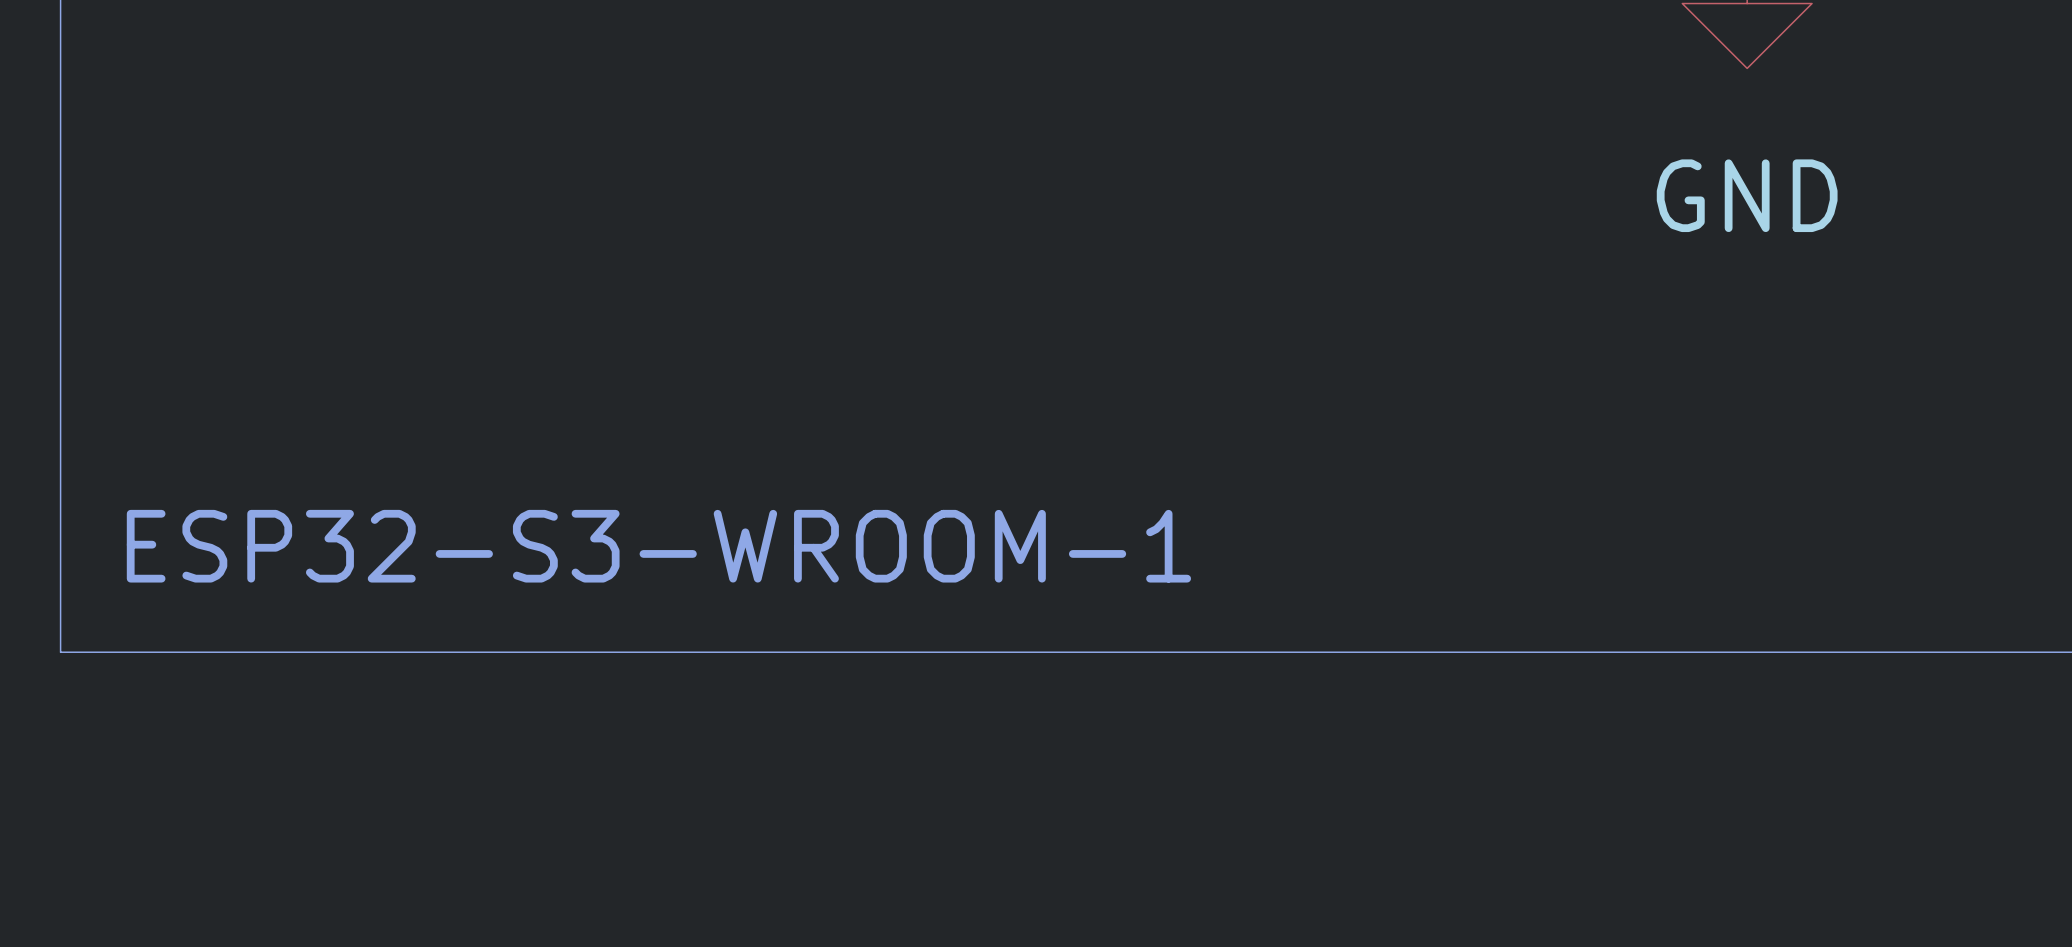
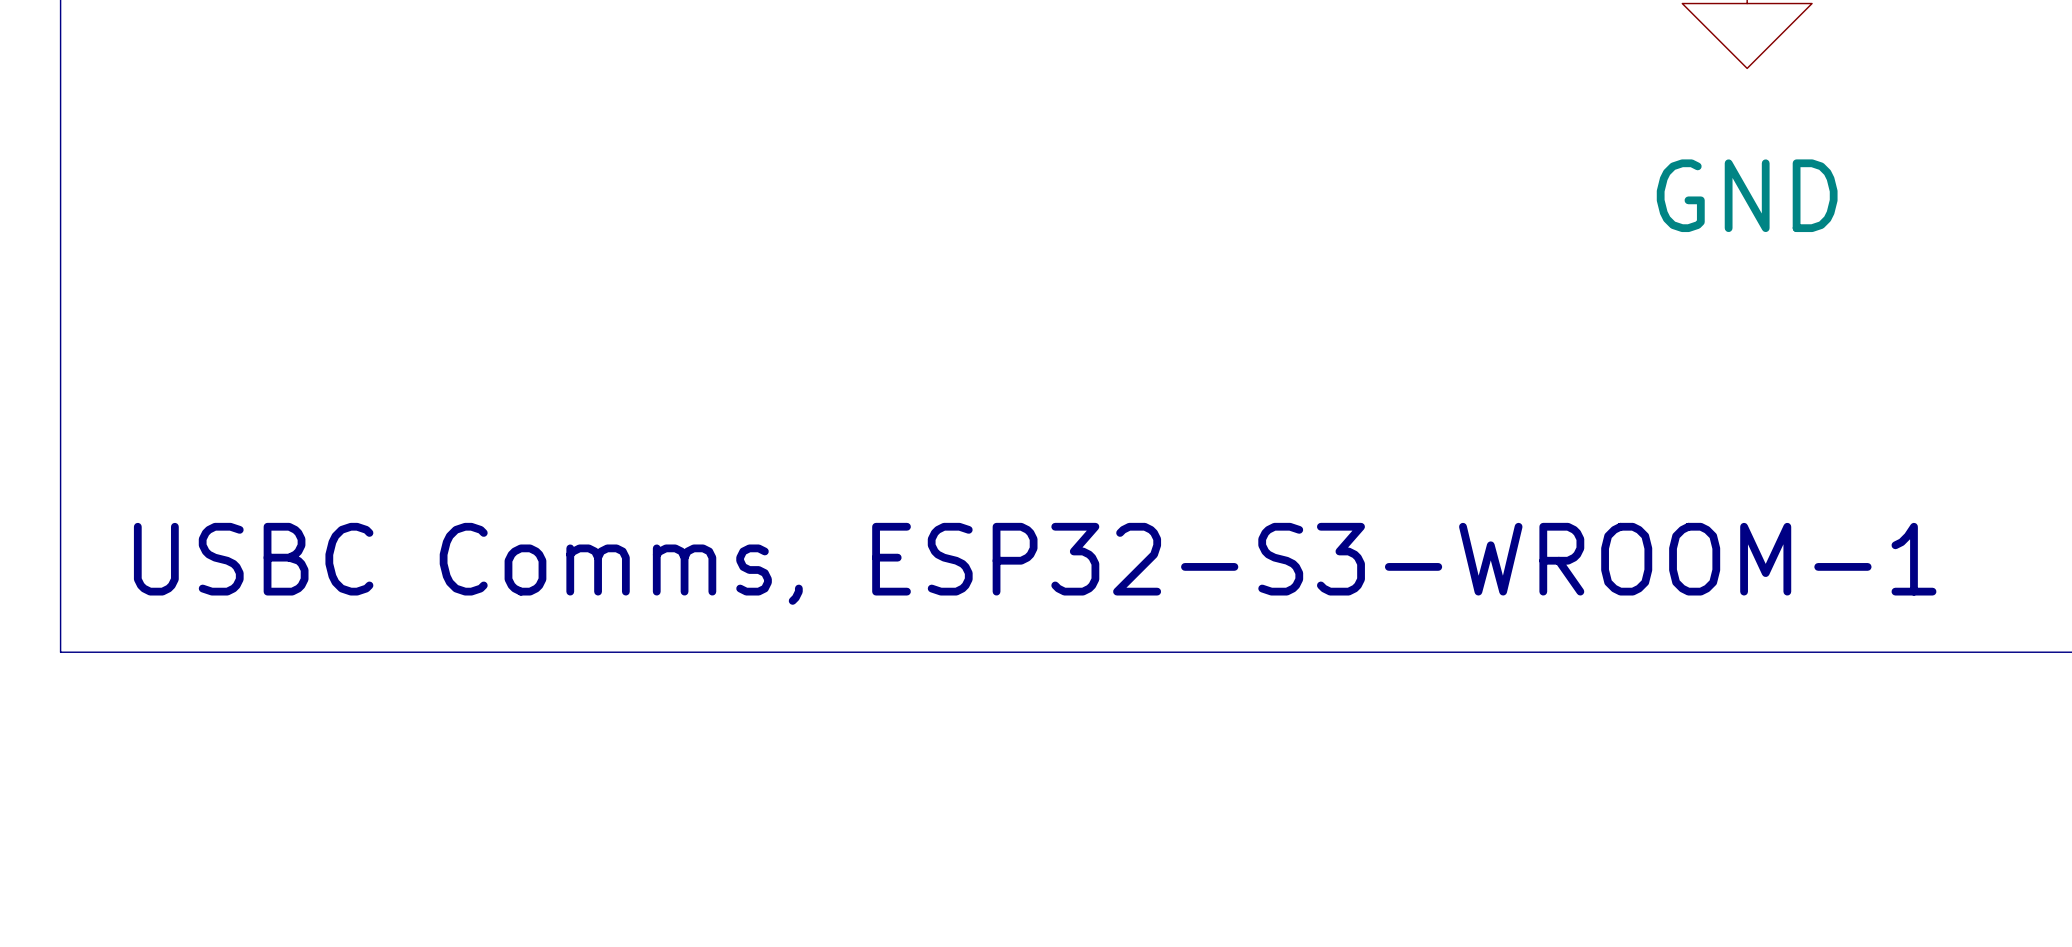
text: ESP32-S3-WROOM-1 (658, 546) -> USBC Comms, ESP32-S3-WROOM-1 (1035, 563)

